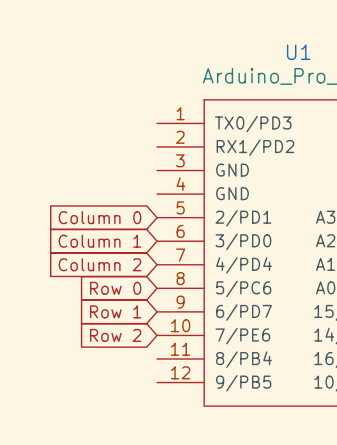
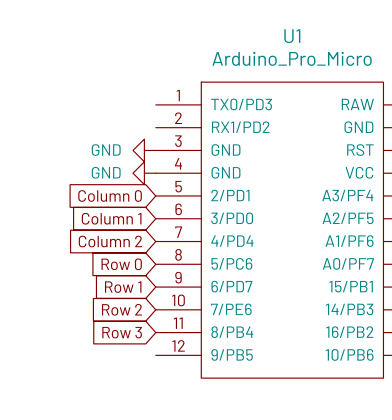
power symbol: none -> GND (144, 150)
power symbol: none -> GND (144, 173)
global label: none -> Row 3 (122, 332)

